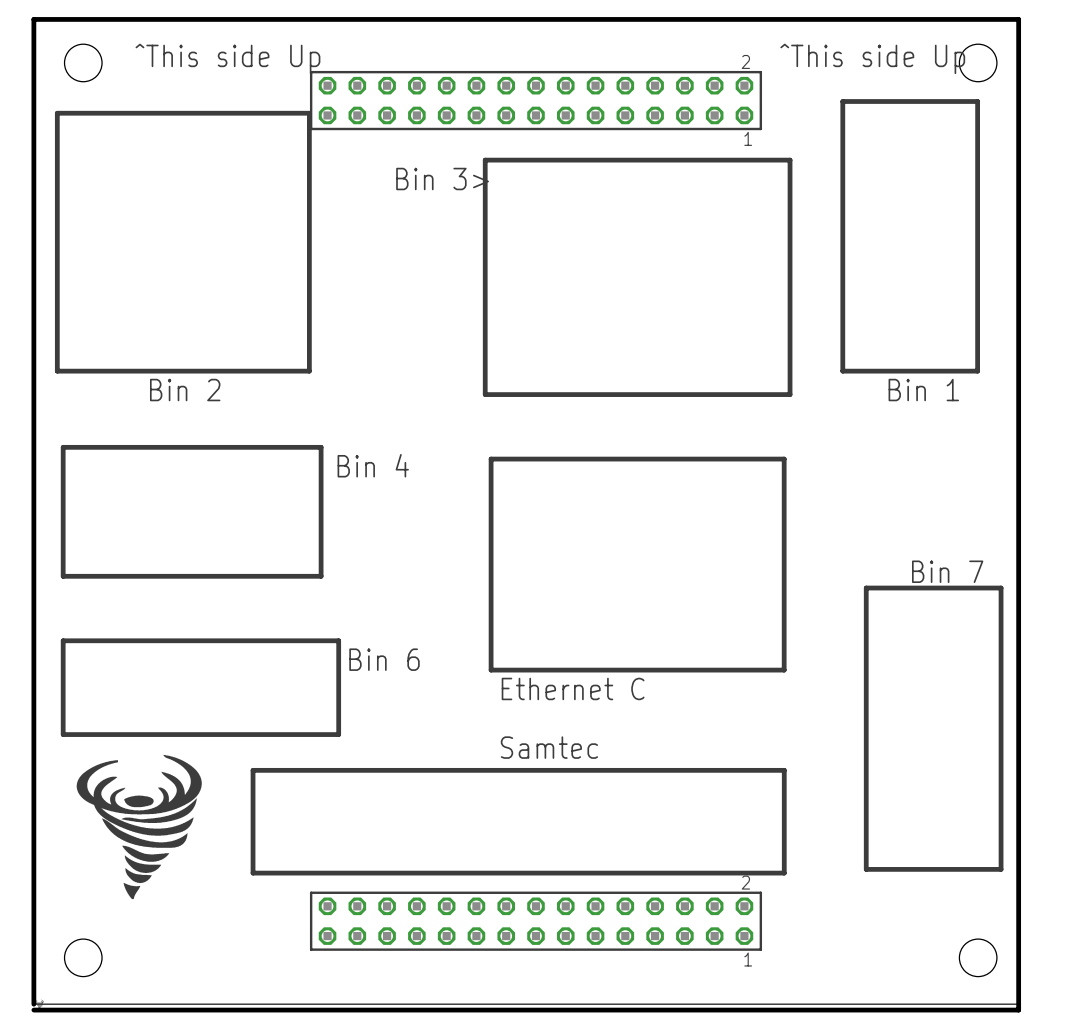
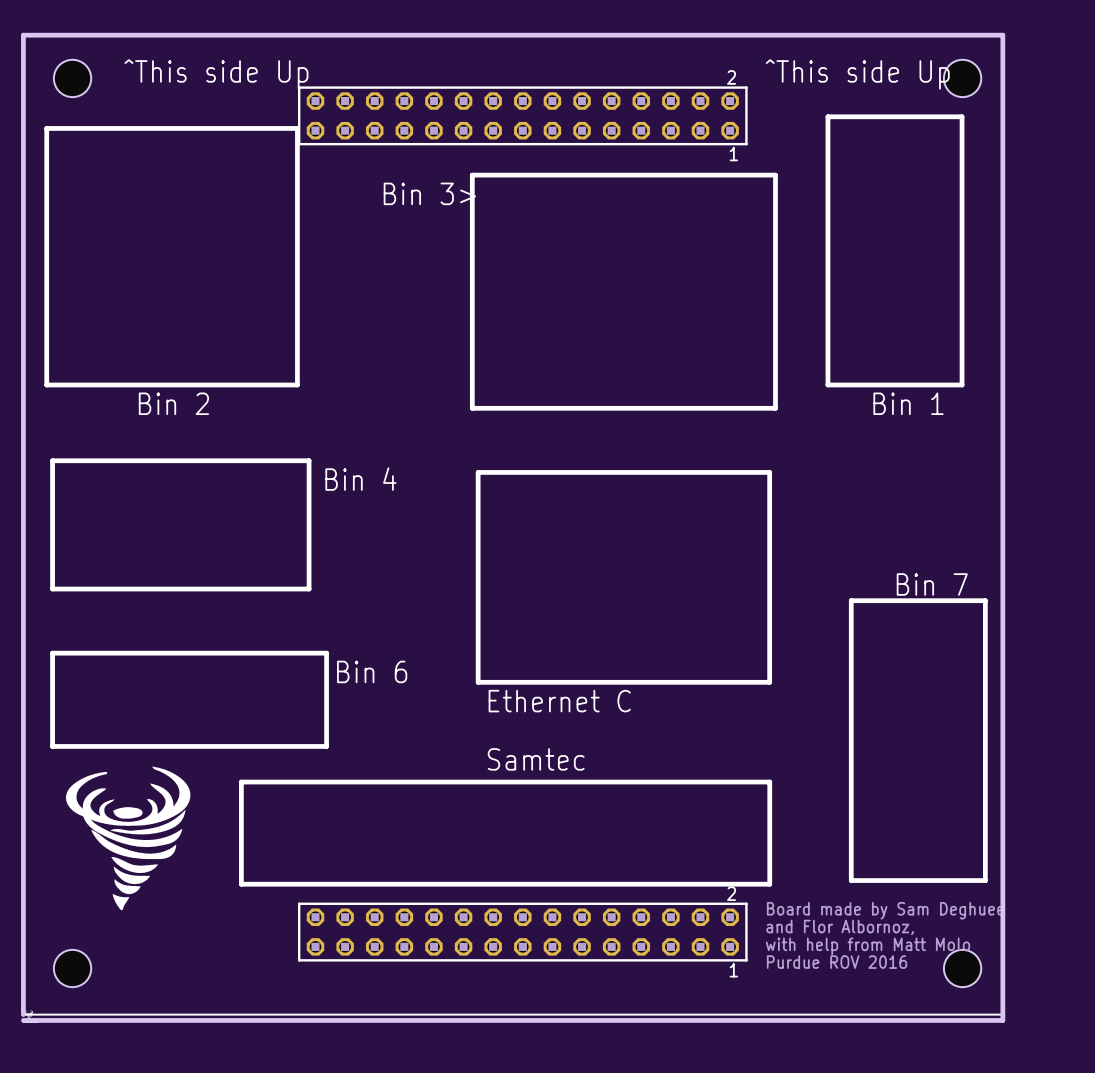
text: none -> Board made by Sam Deghuee (885, 910)
text: none -> and Flor Albornoz, (840, 927)
text: none -> with help from Matt Molo (868, 946)
text: none -> Purdue ROV 2016 (837, 962)

